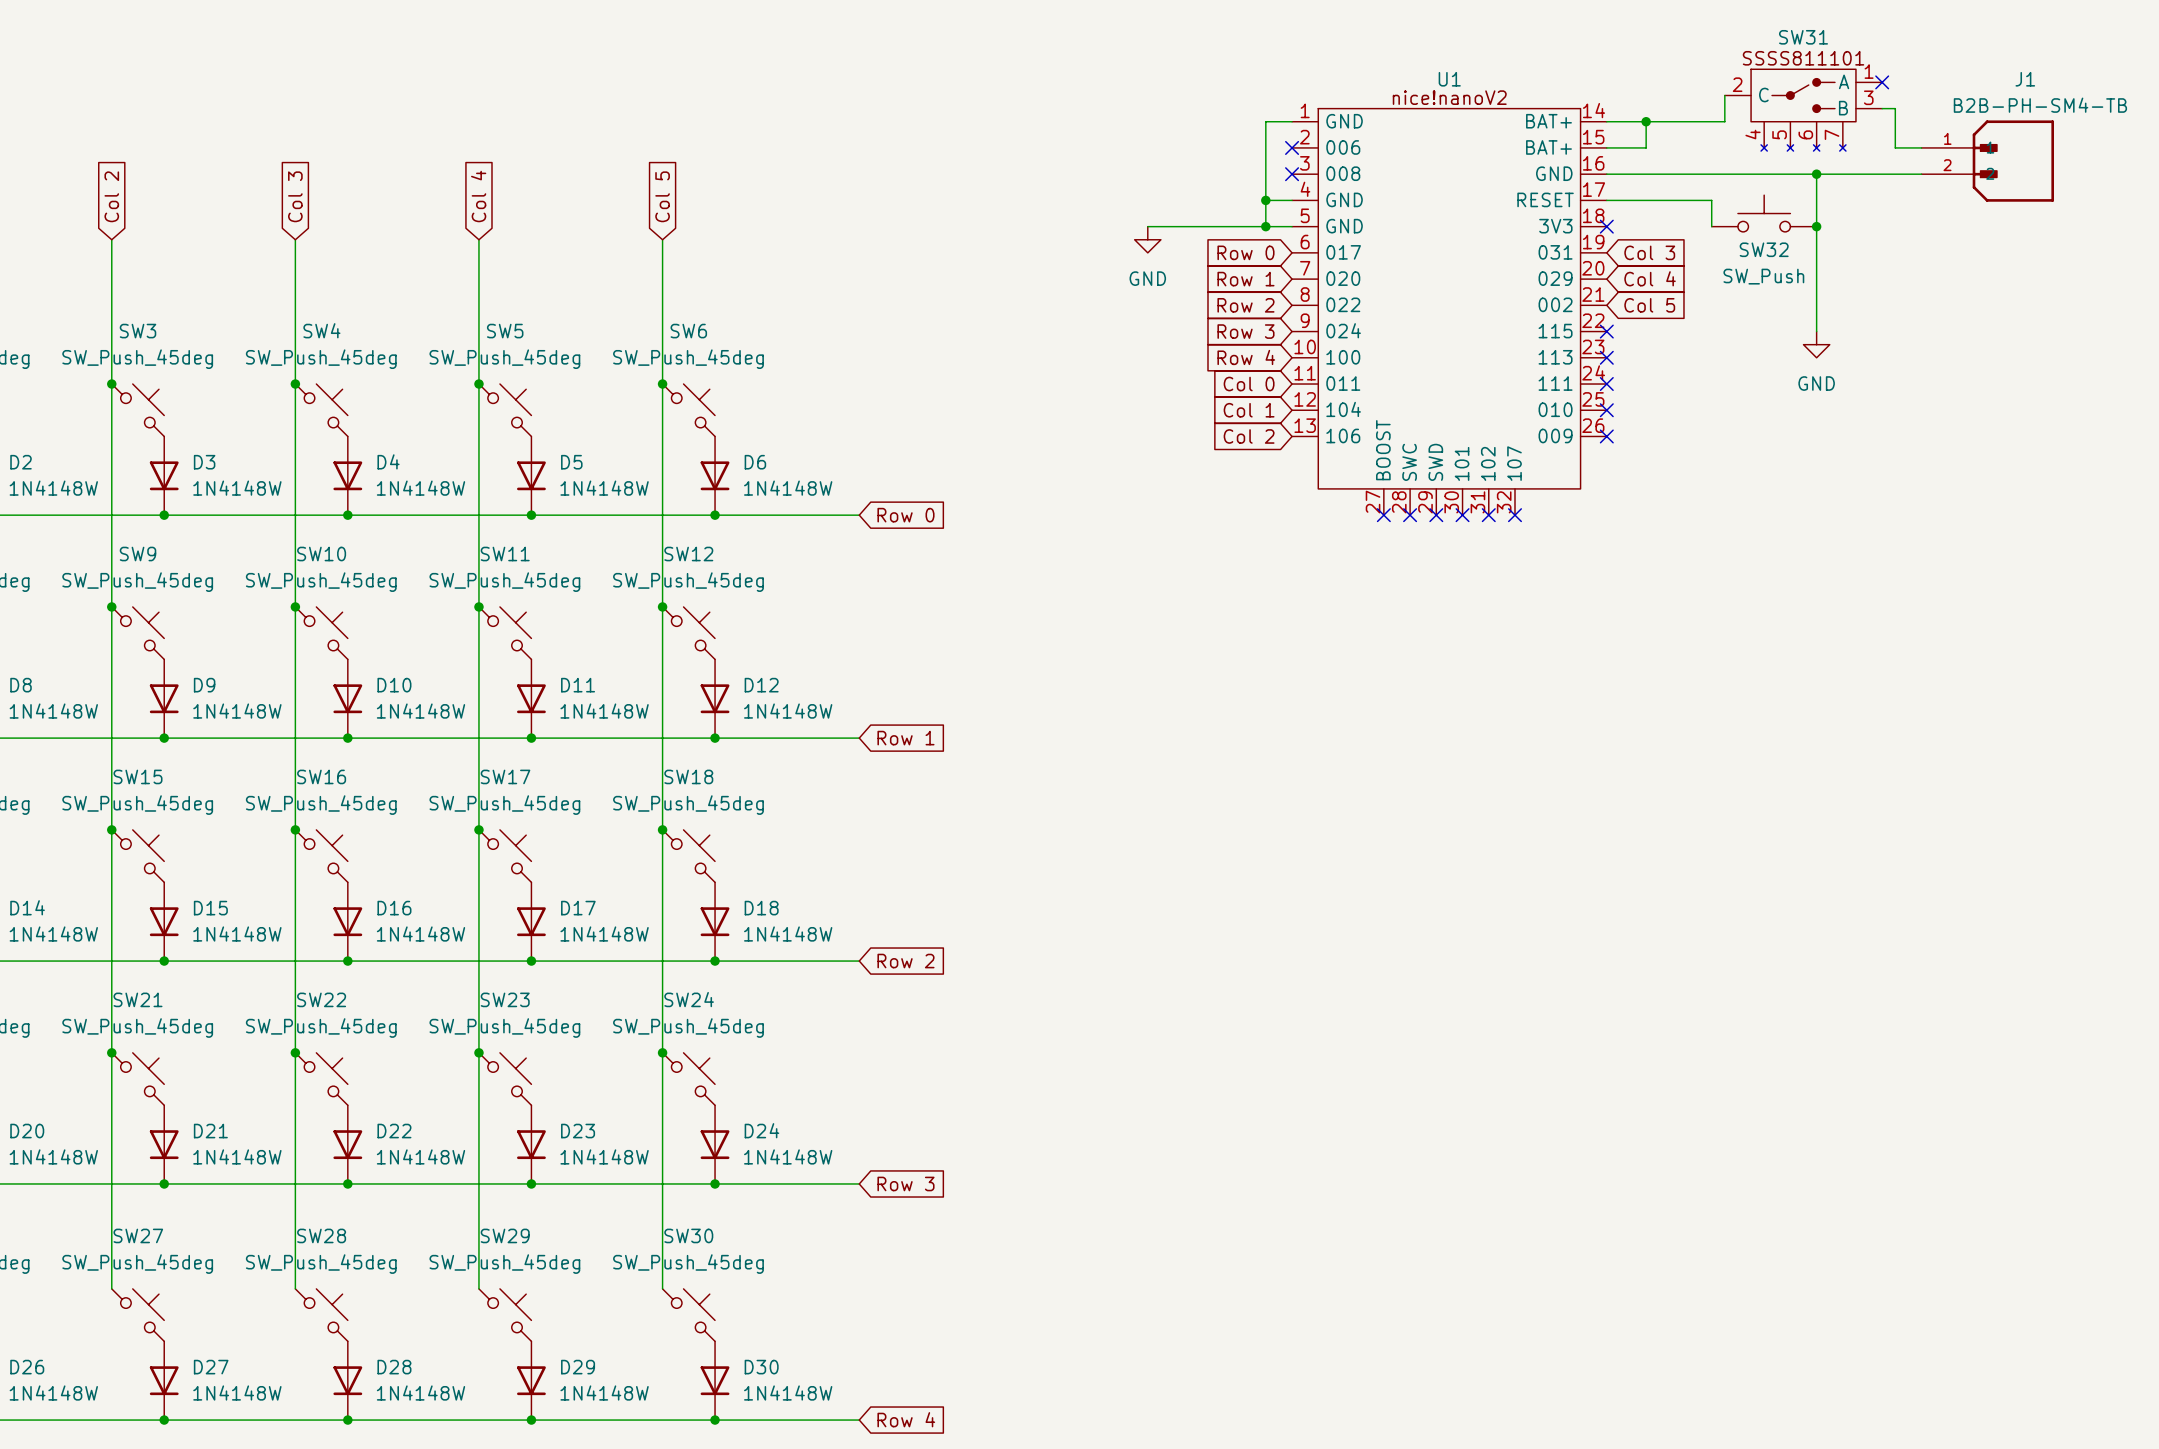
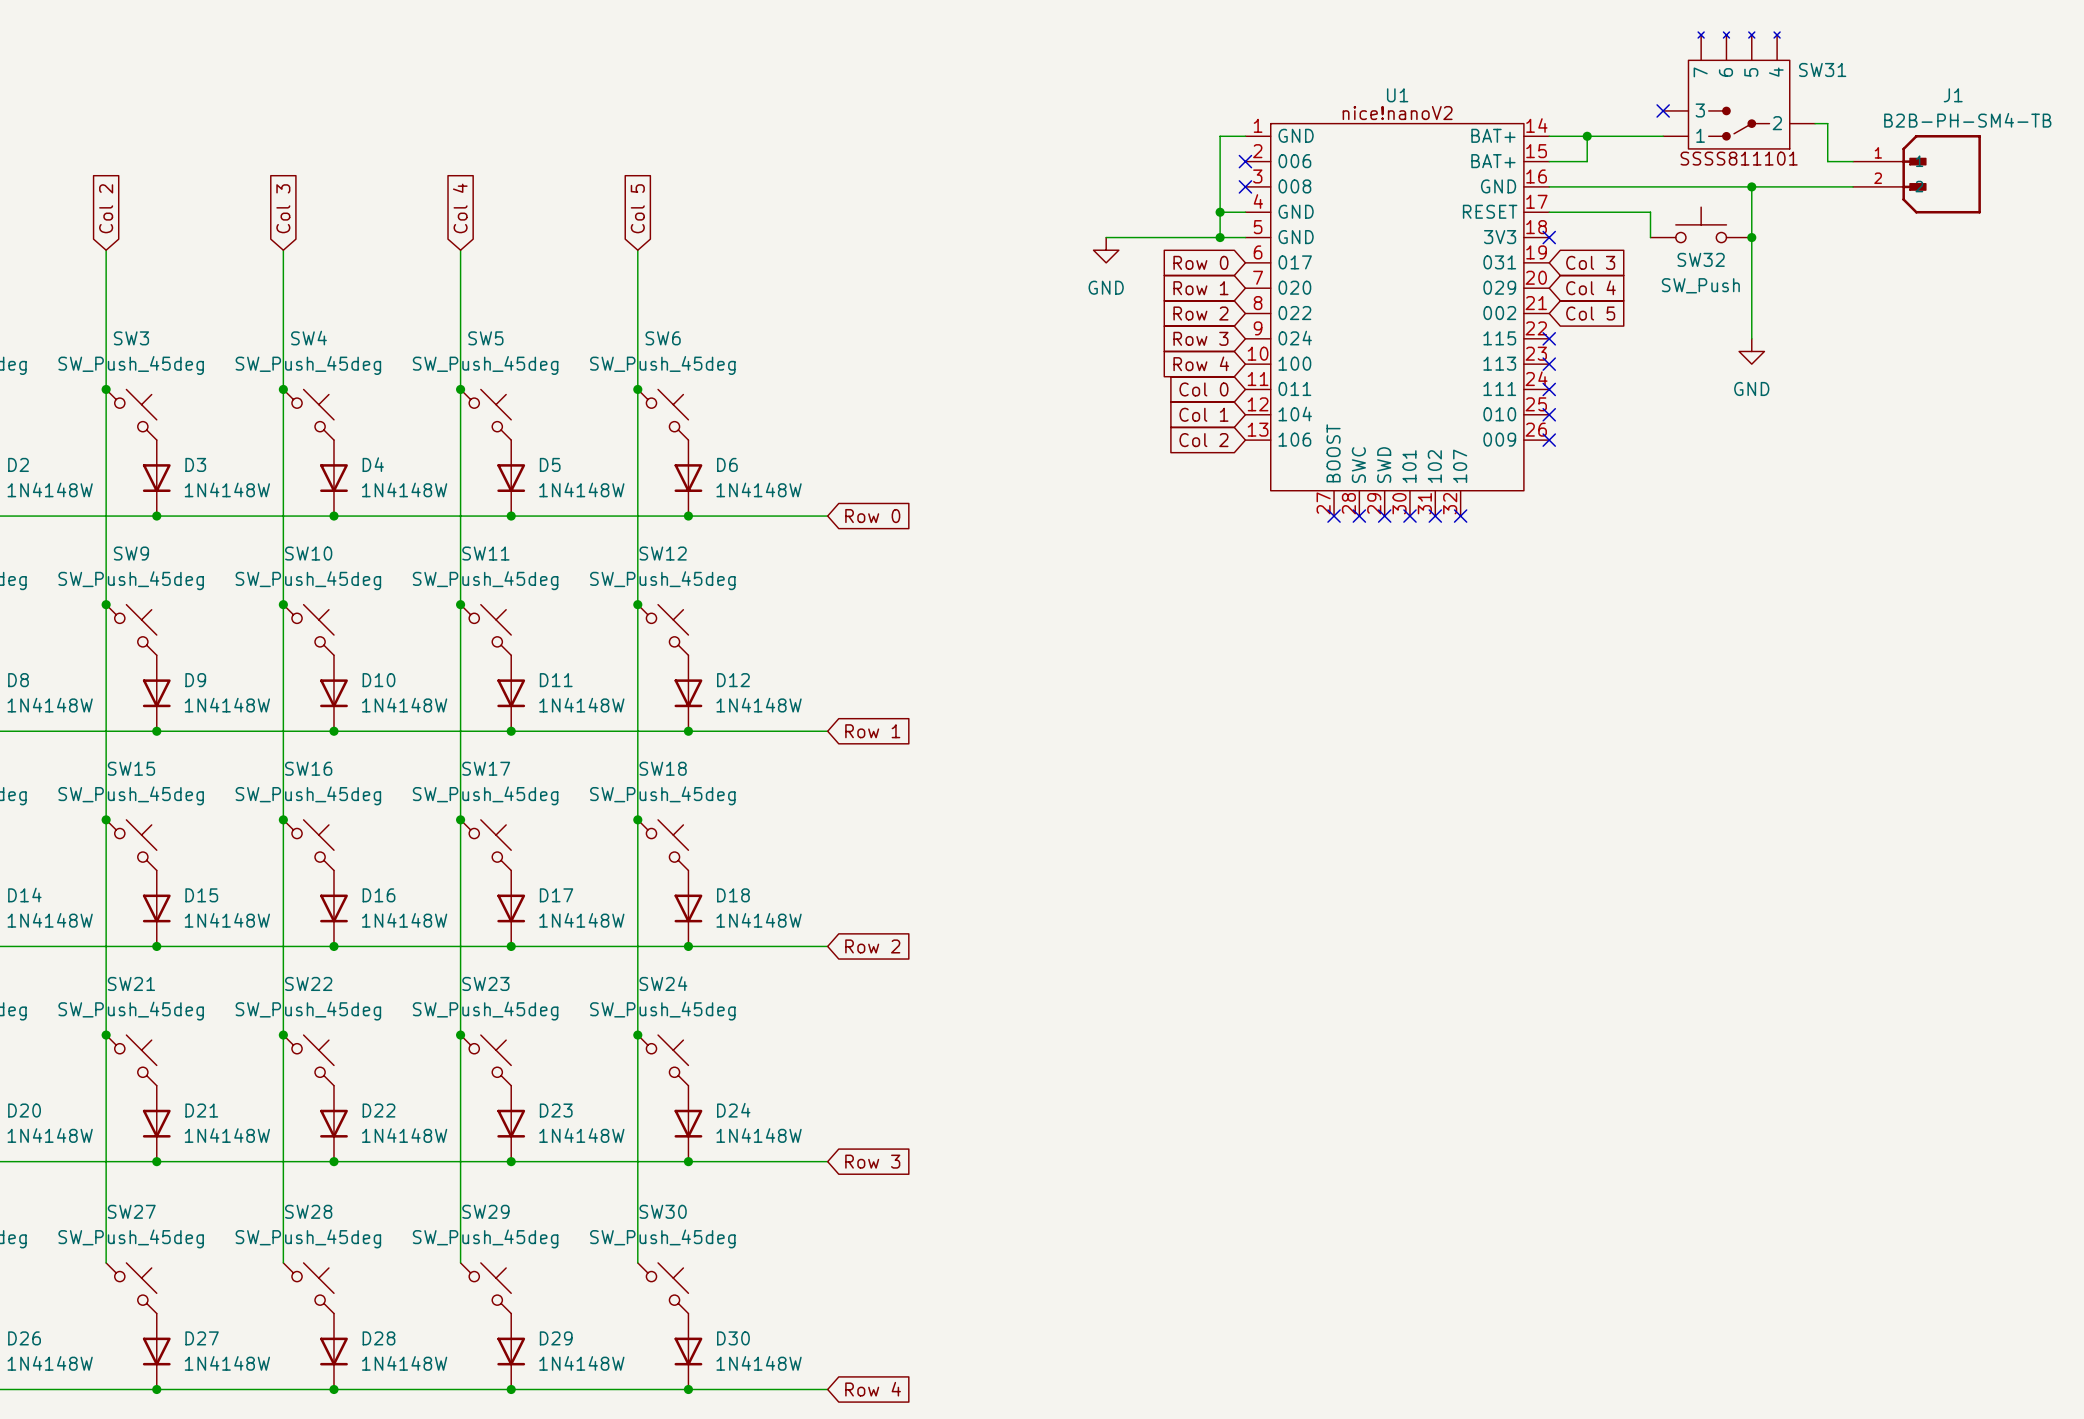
SW31 name position: SW31 (1803, 37) -> SW31 (1822, 69)
SW31 symbol: [1724, 69, 1883, 152] -> [1663, 32, 1816, 149]
no-connect mark: (1882, 82) -> none
wire: (1724, 95) (1724, 121) -> none
no-connect mark: none -> (1663, 110)

